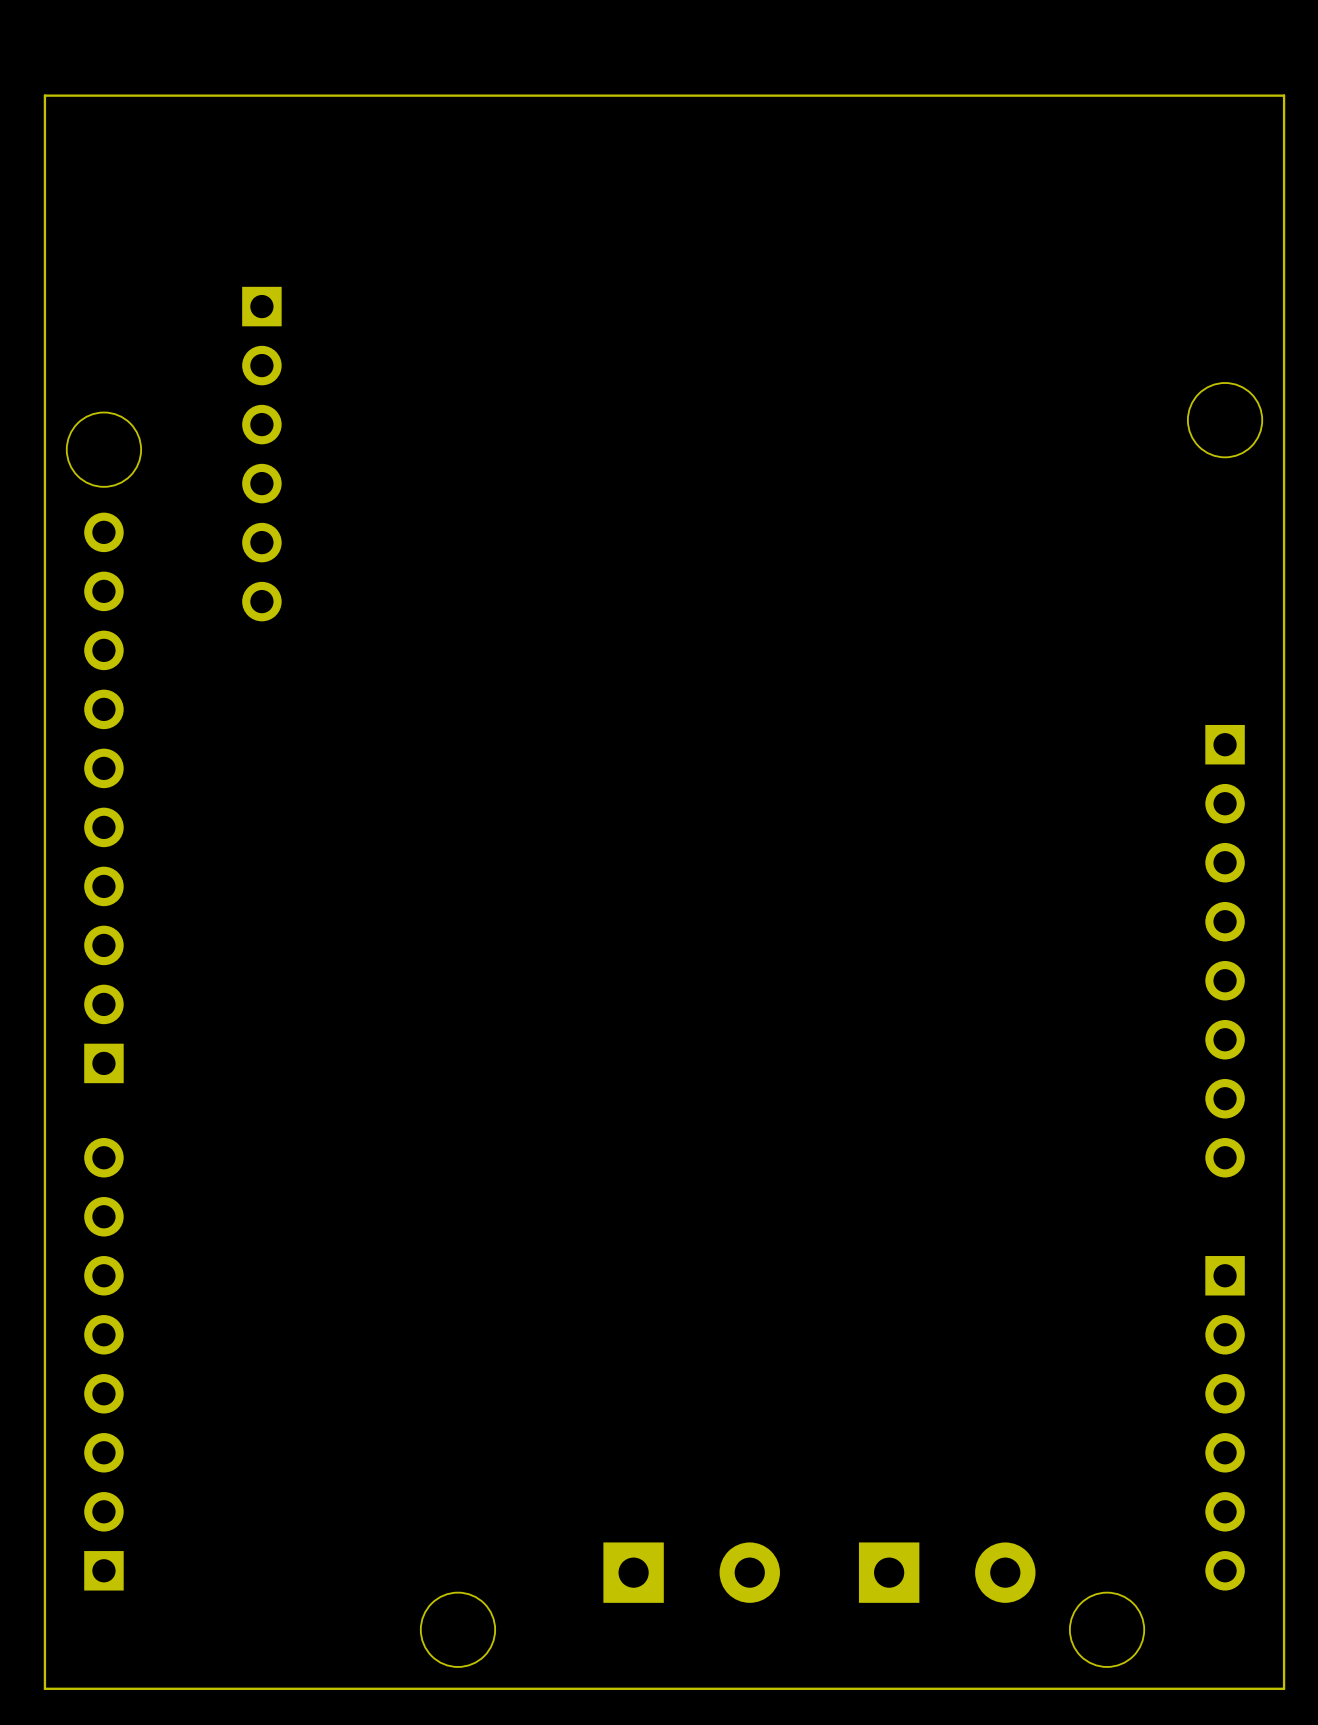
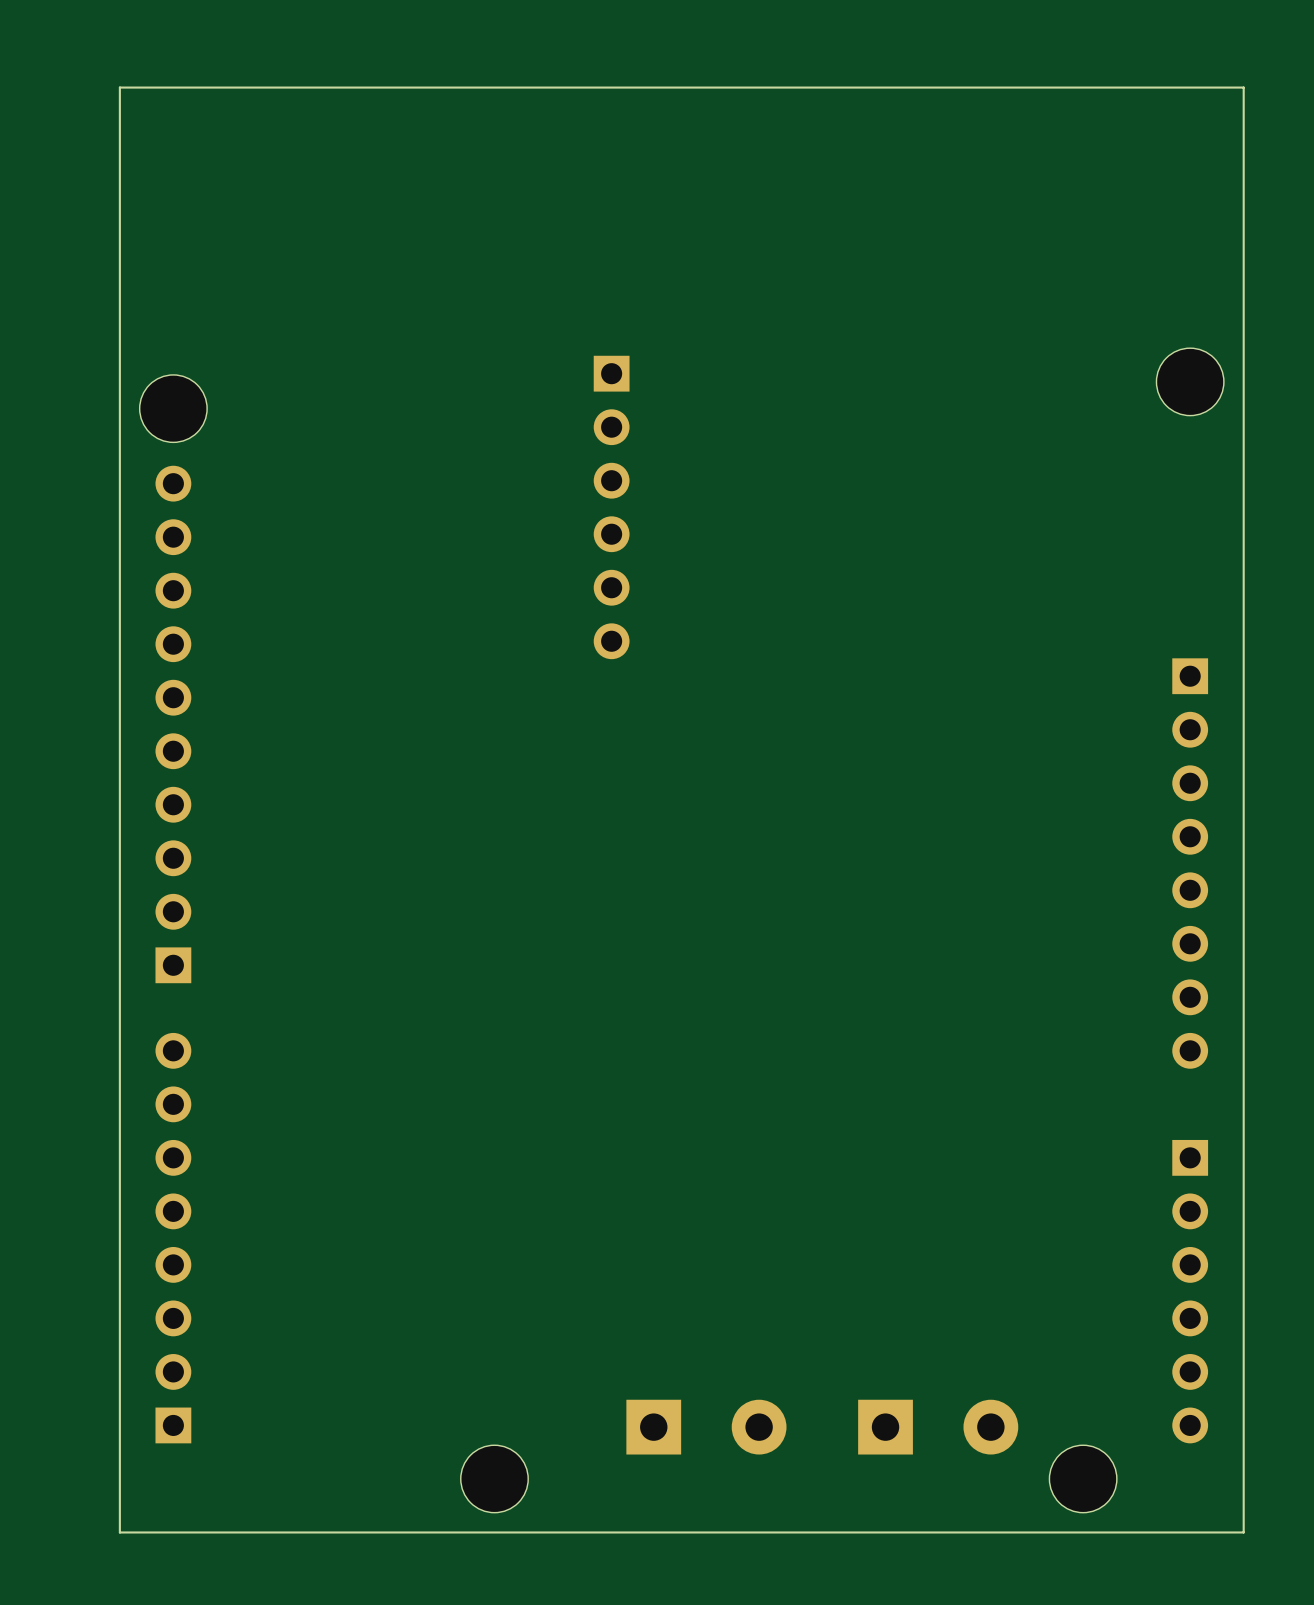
part position: (261, 454) -> (611, 507)

